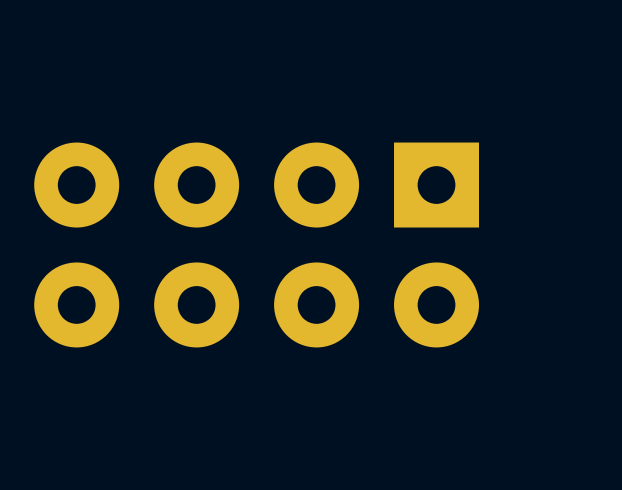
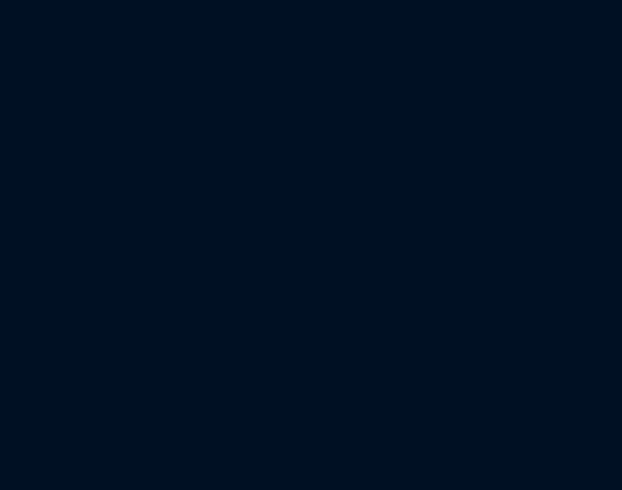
part: (256, 244) -> none

